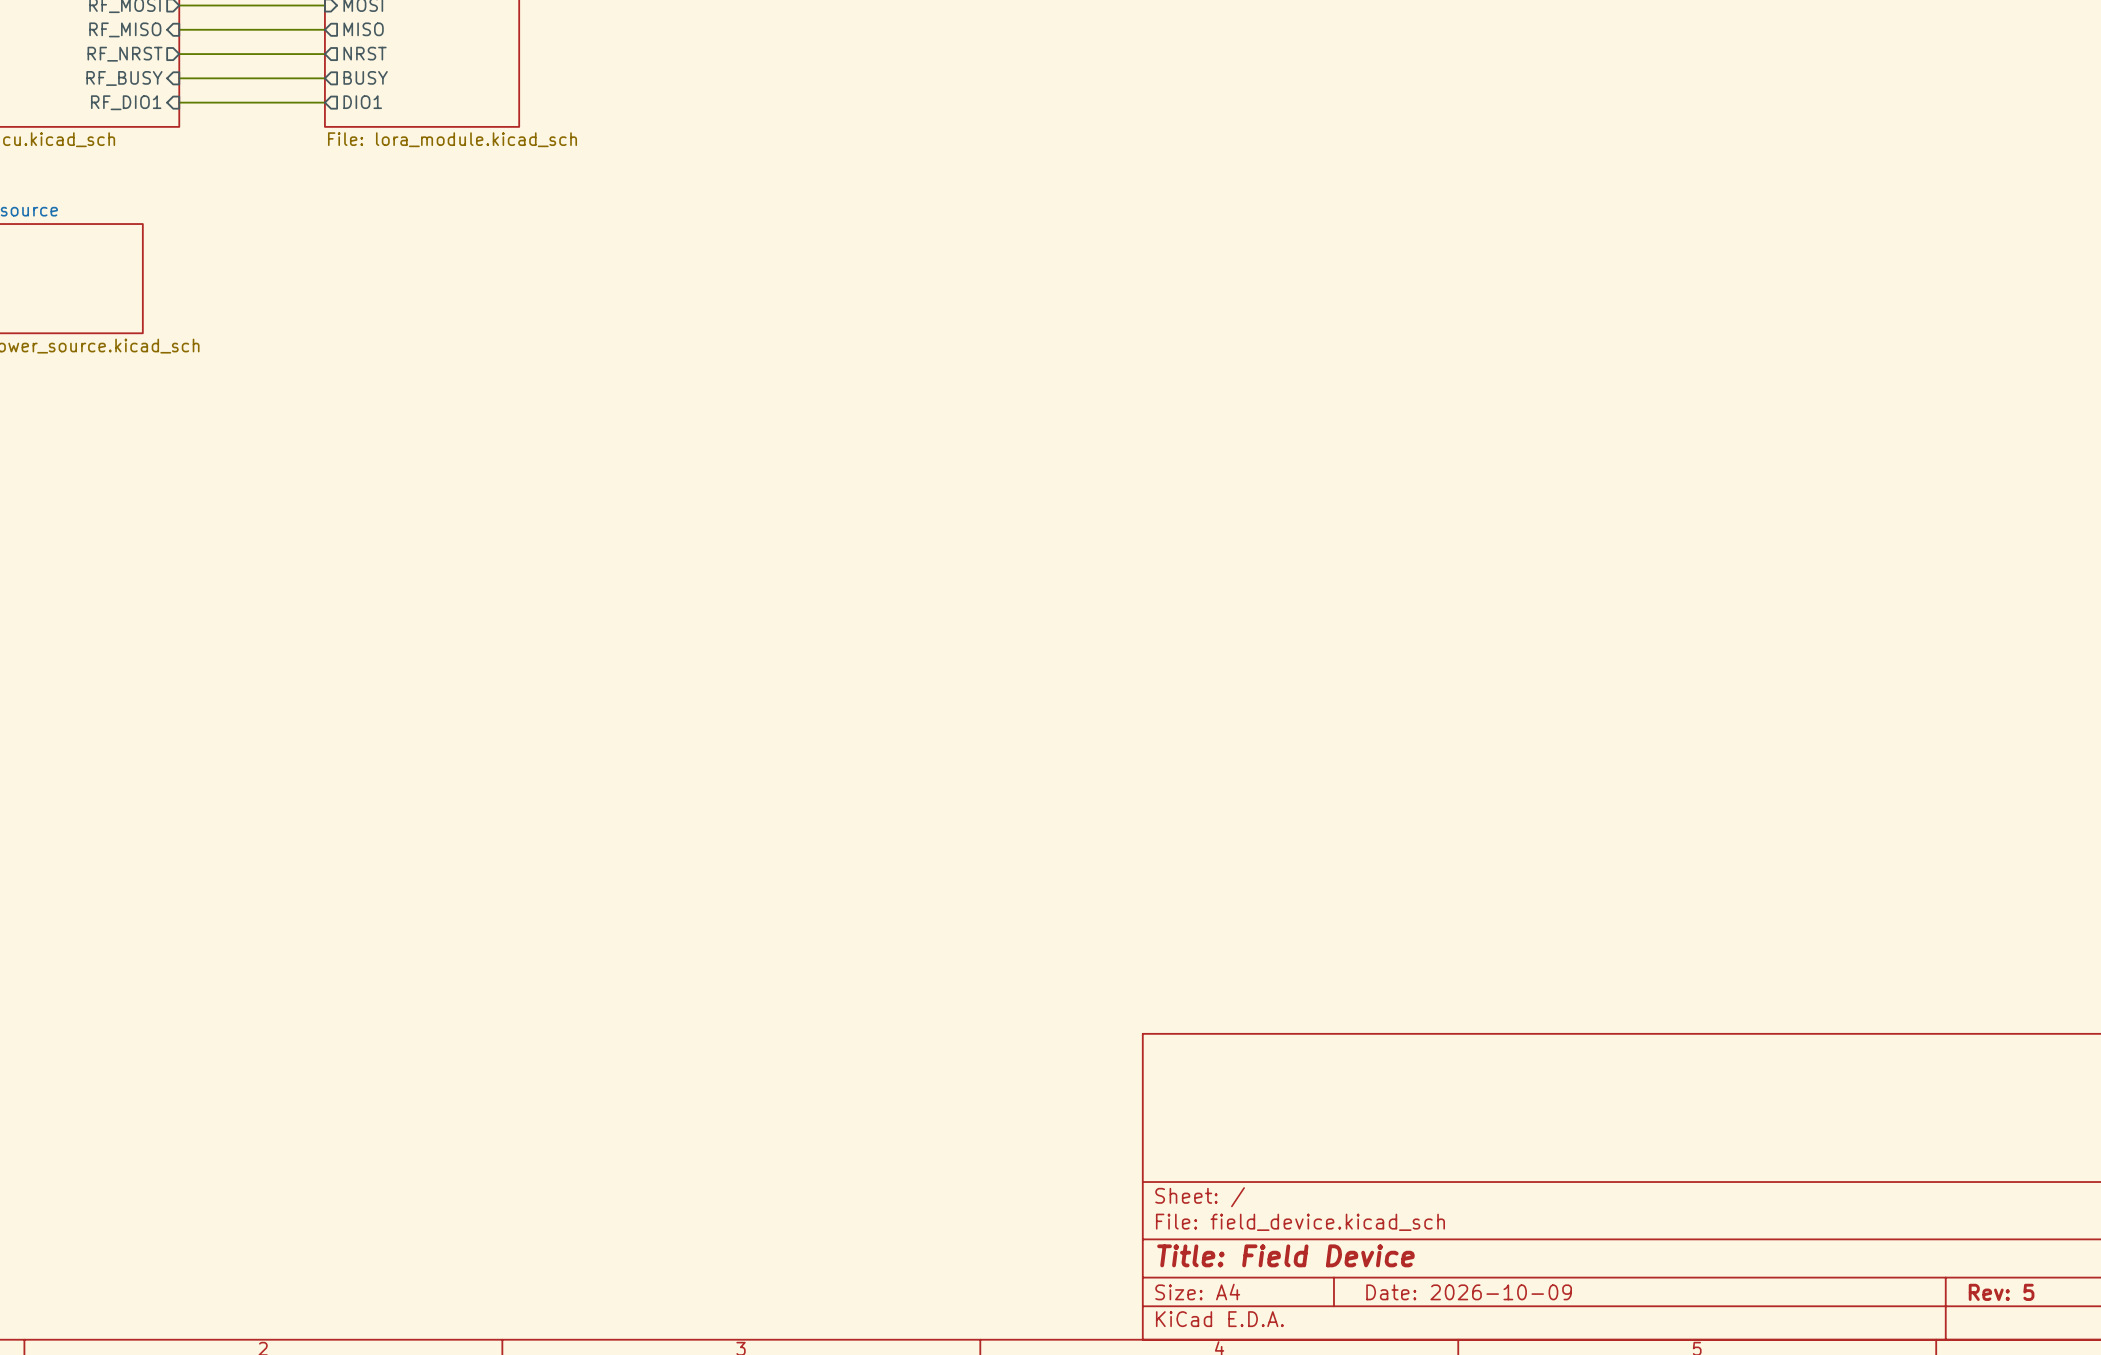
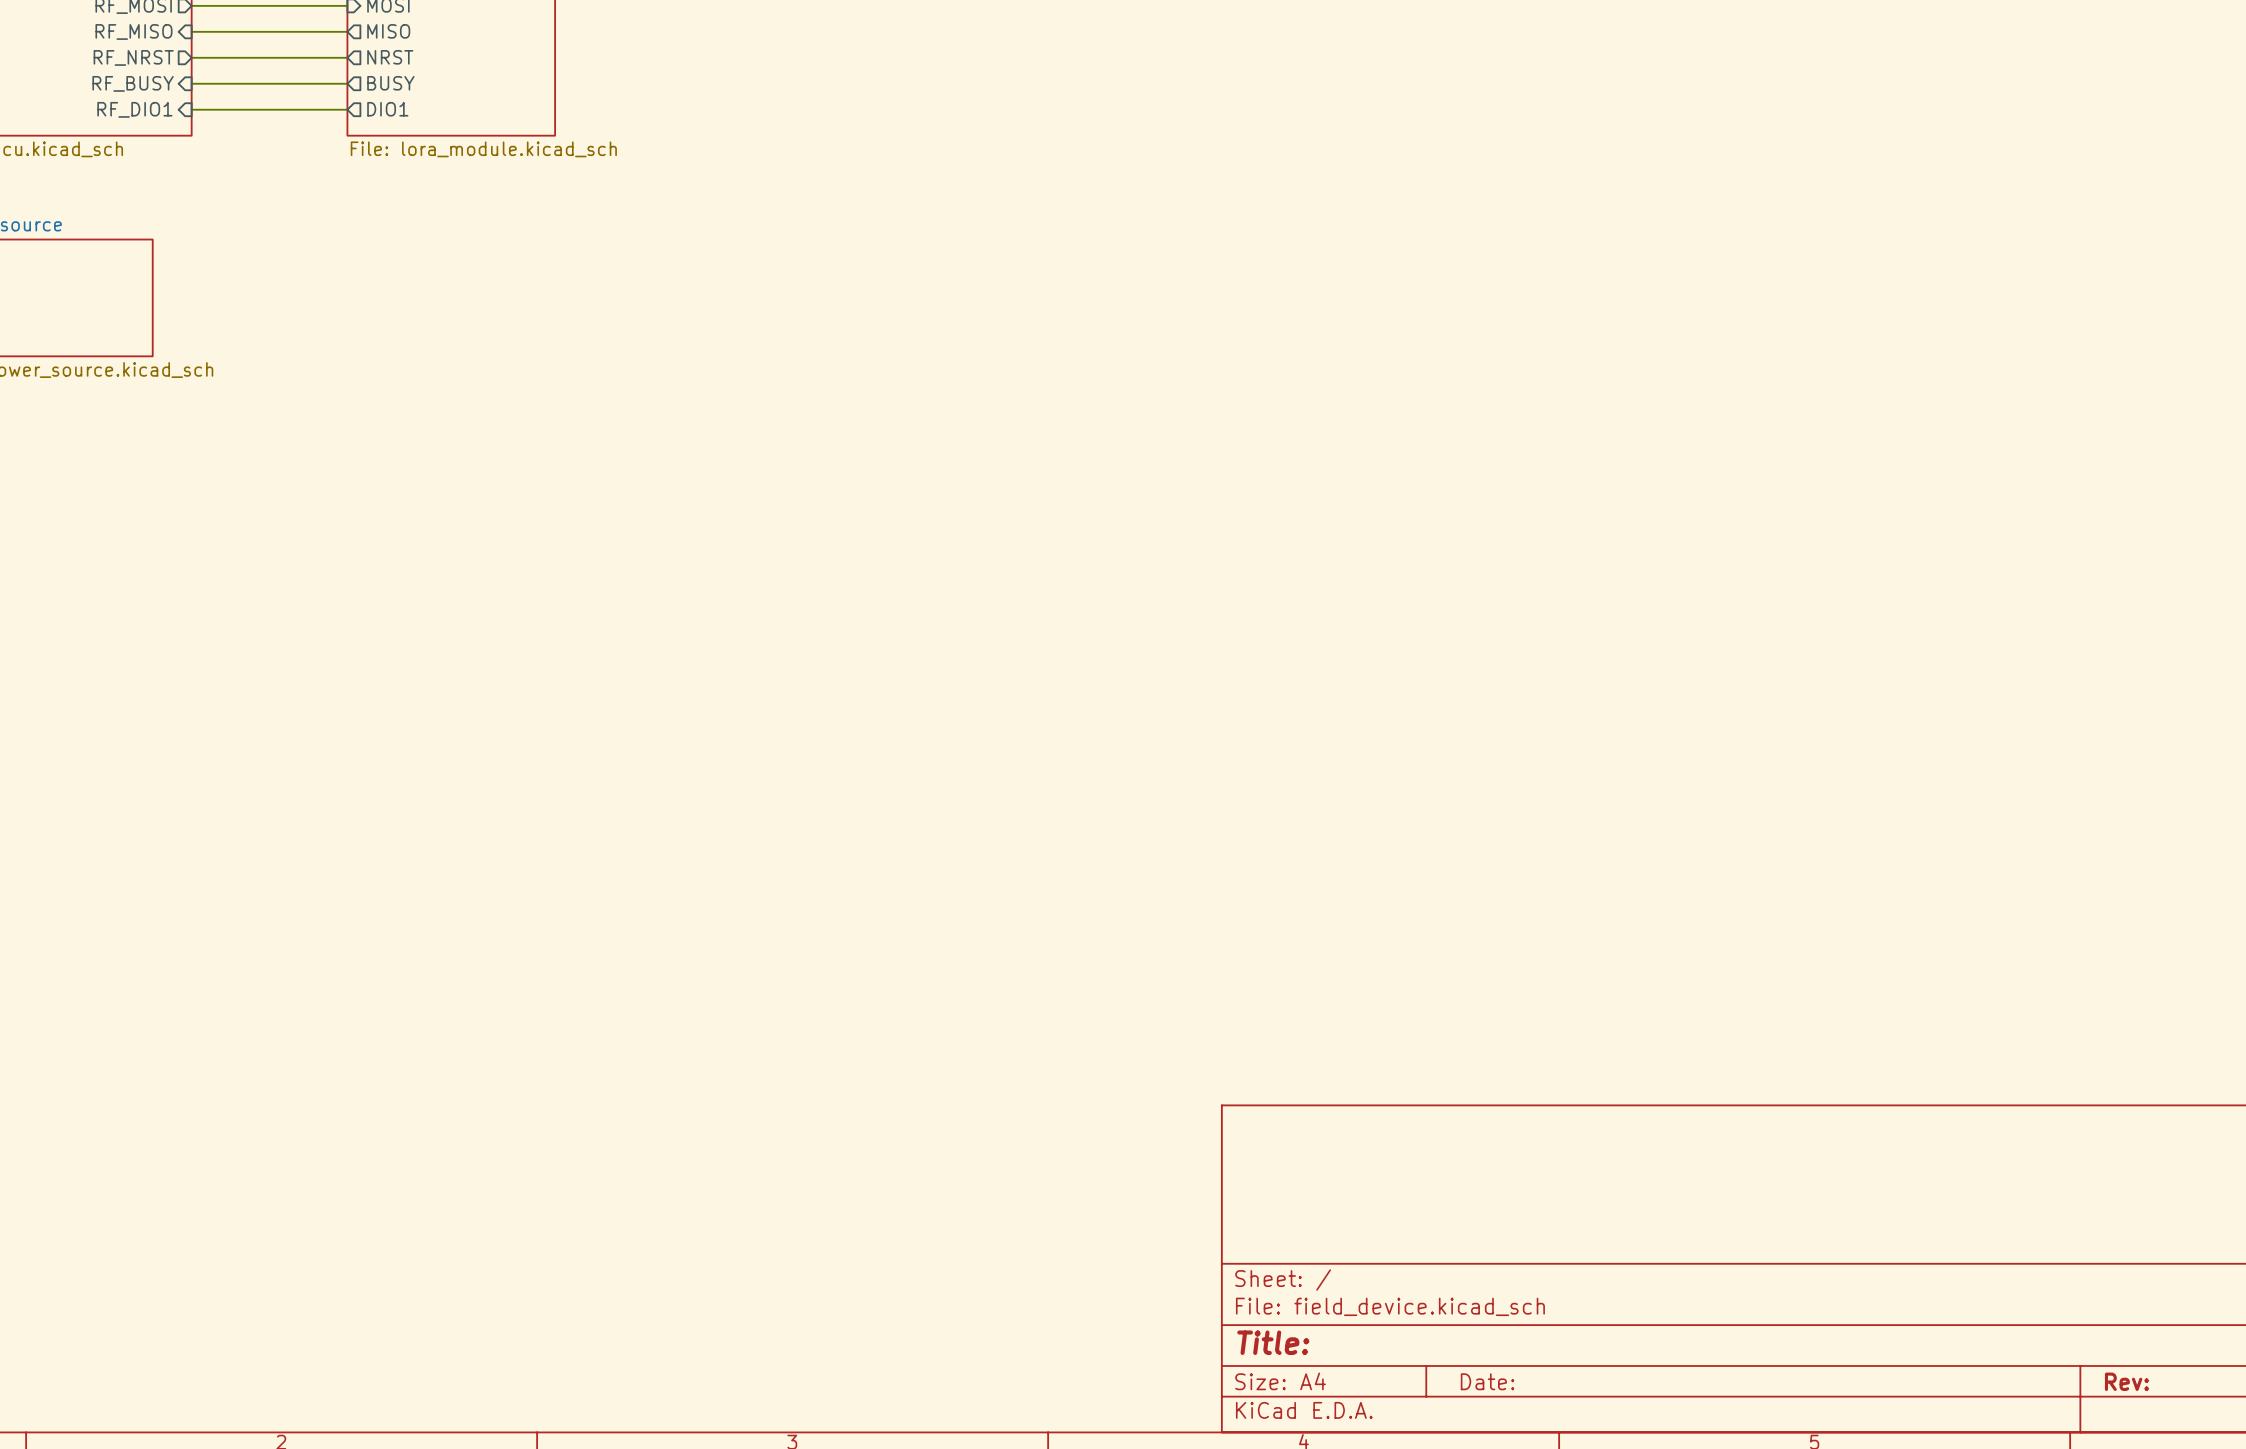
title block: Title: Field Device (1285, 1255) -> Title: (1273, 1342)
title block: Date: 2026-10-09 (1469, 1292) -> Date: (1487, 1381)
title block: Rev: 5 (2001, 1292) -> Rev: (2126, 1381)

